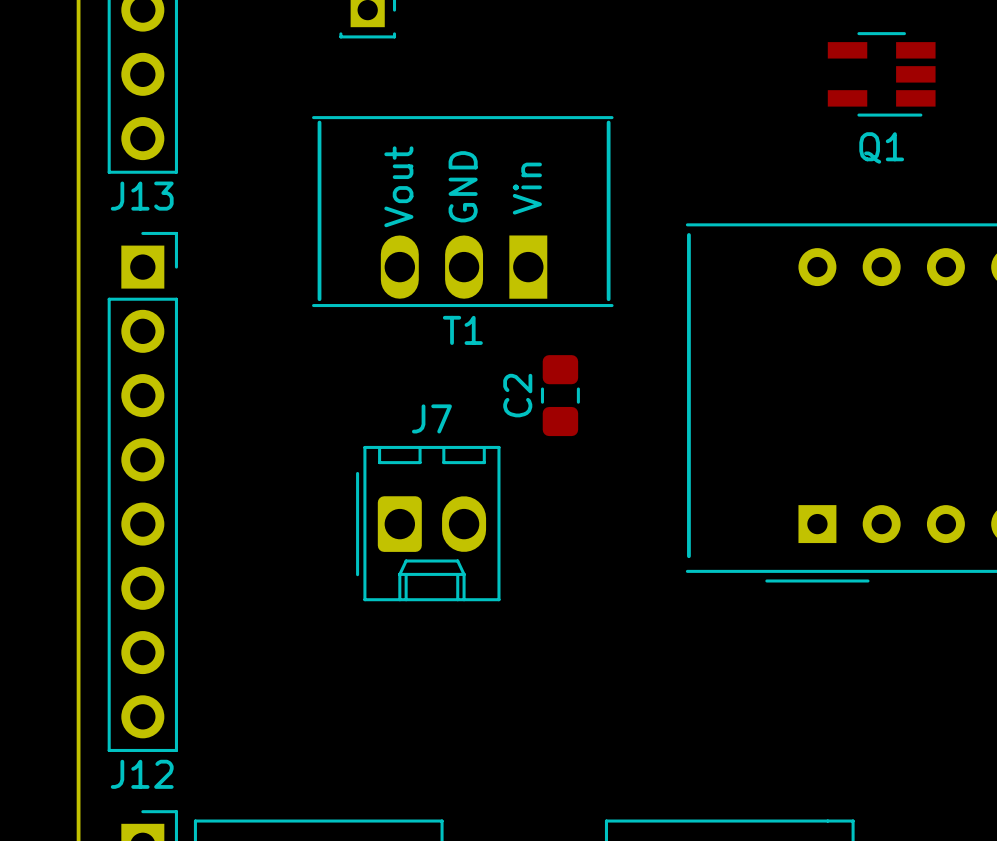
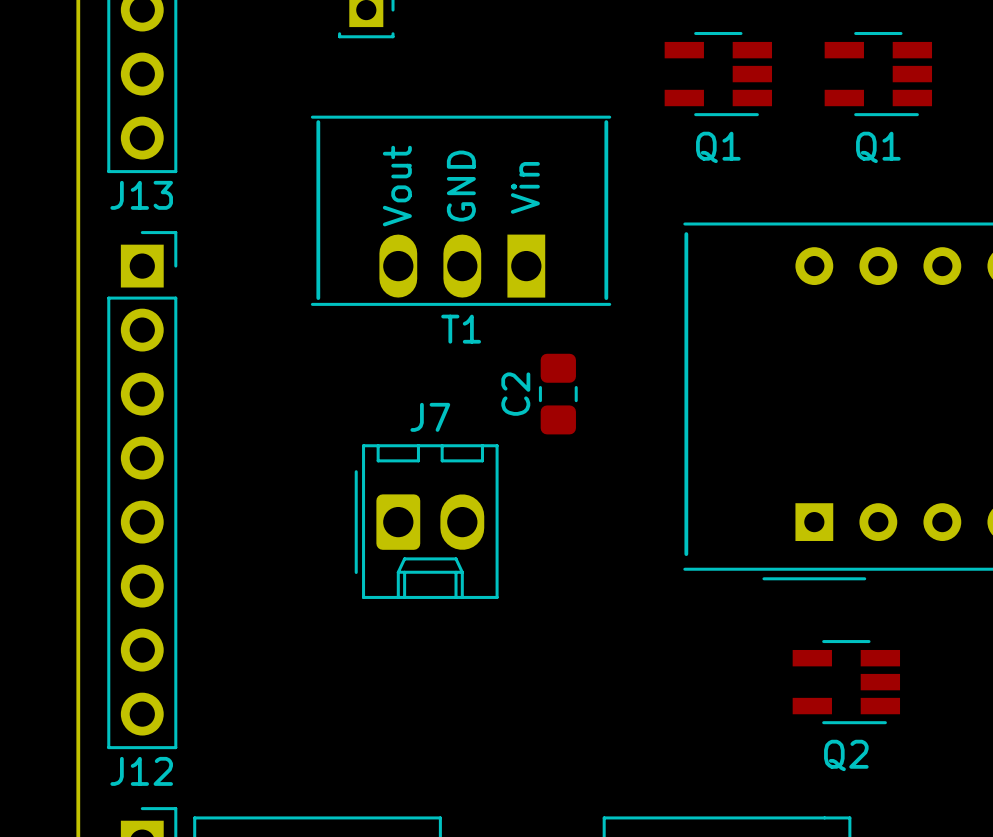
Q1: none -> (718, 74)
Q2: none -> (846, 682)

